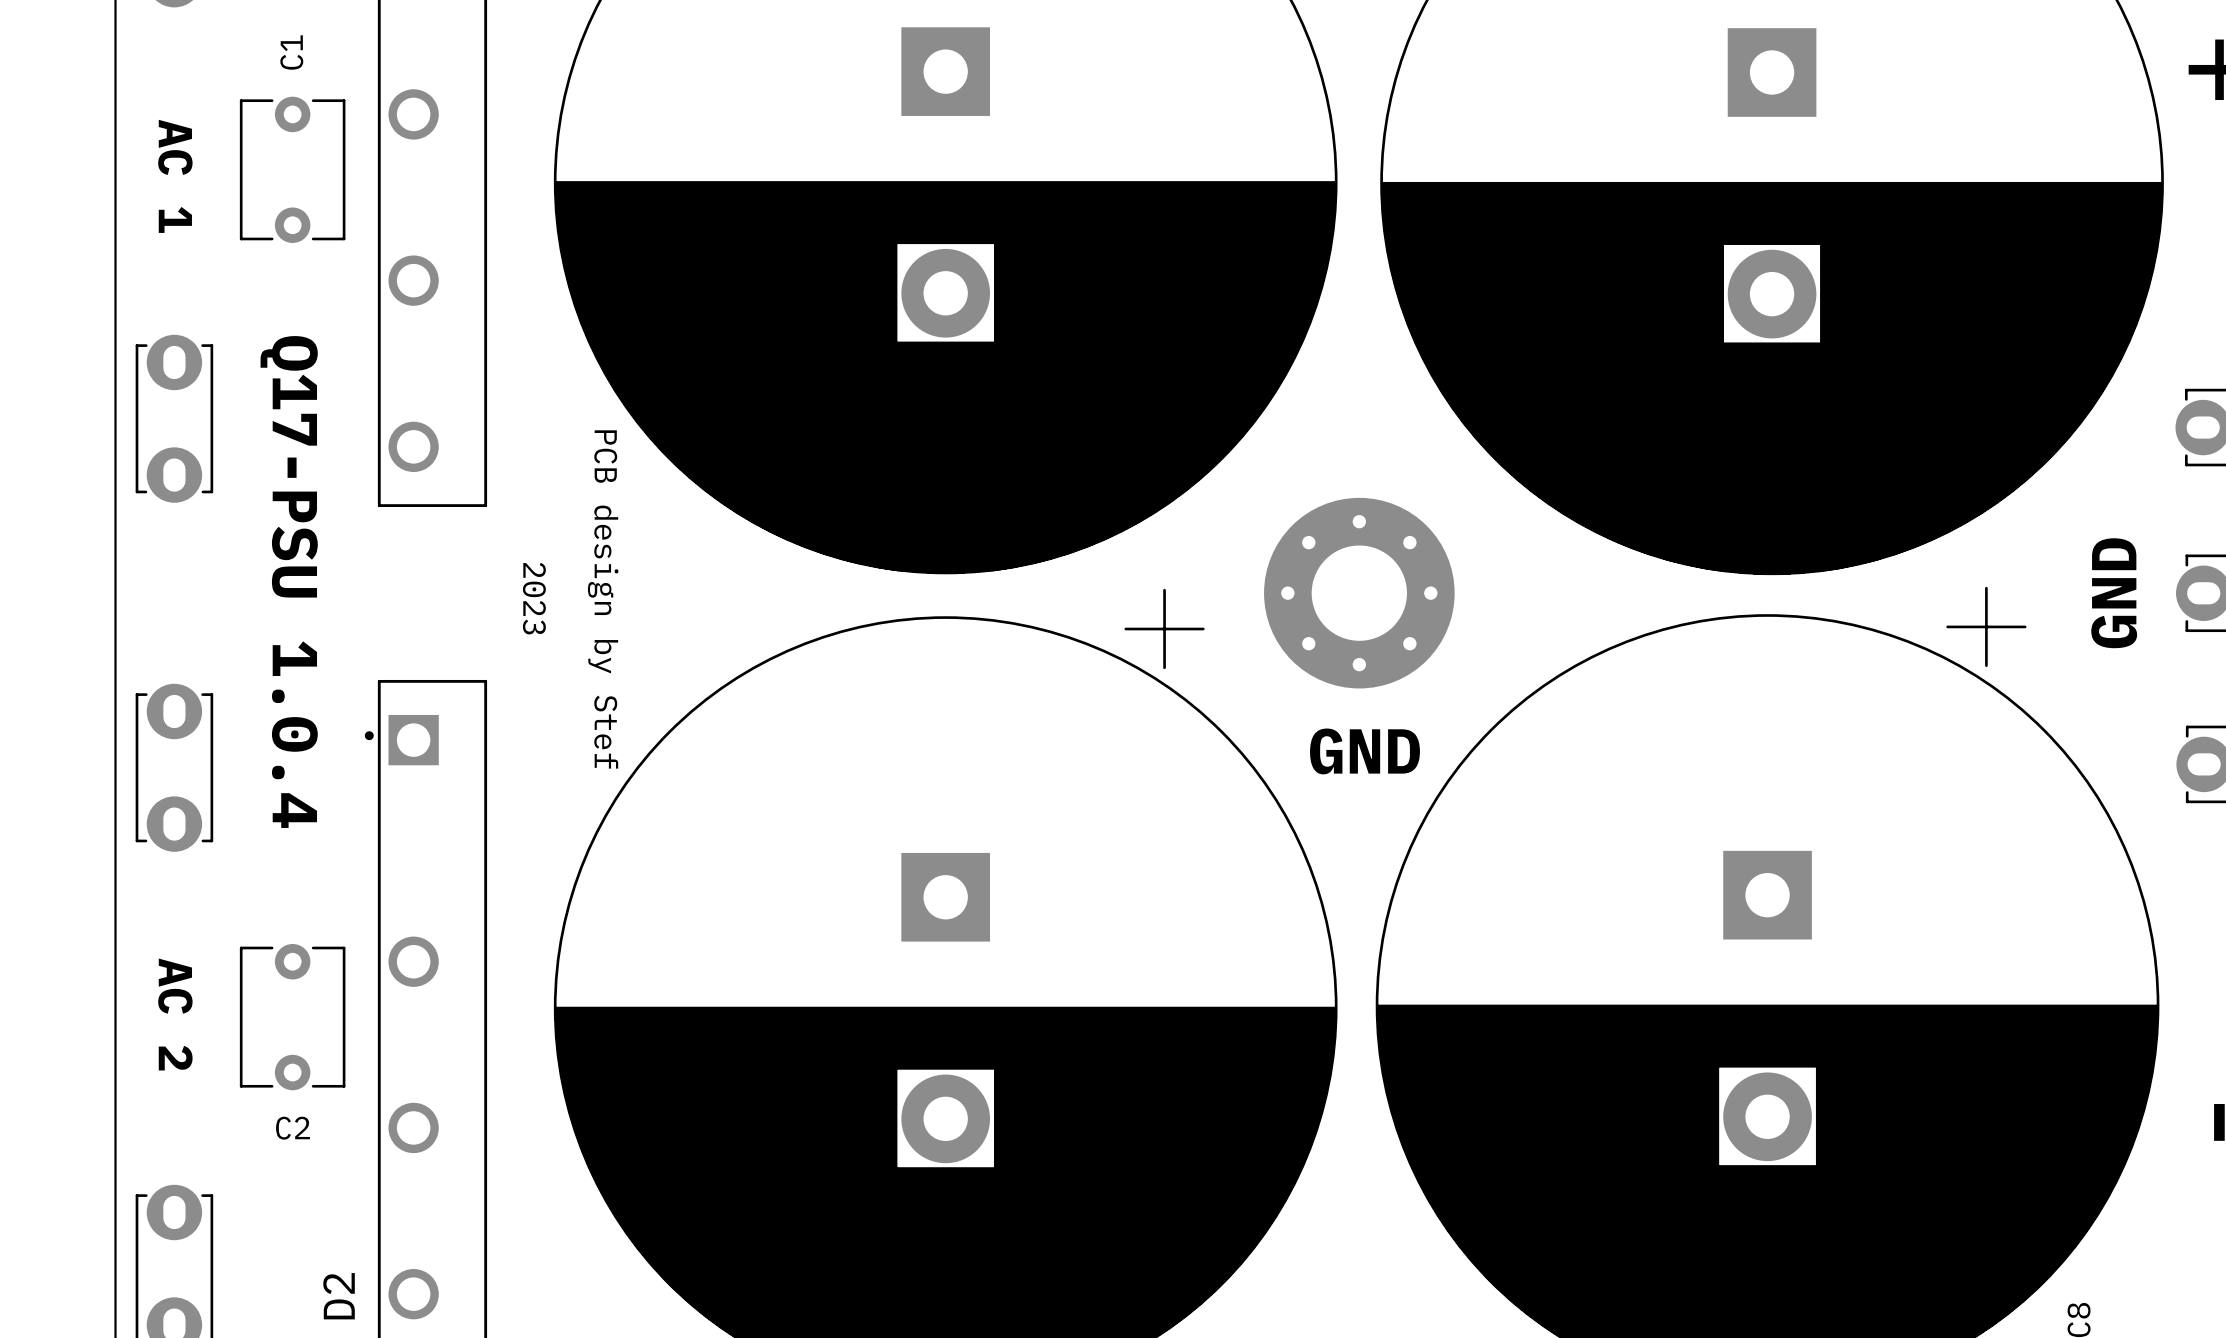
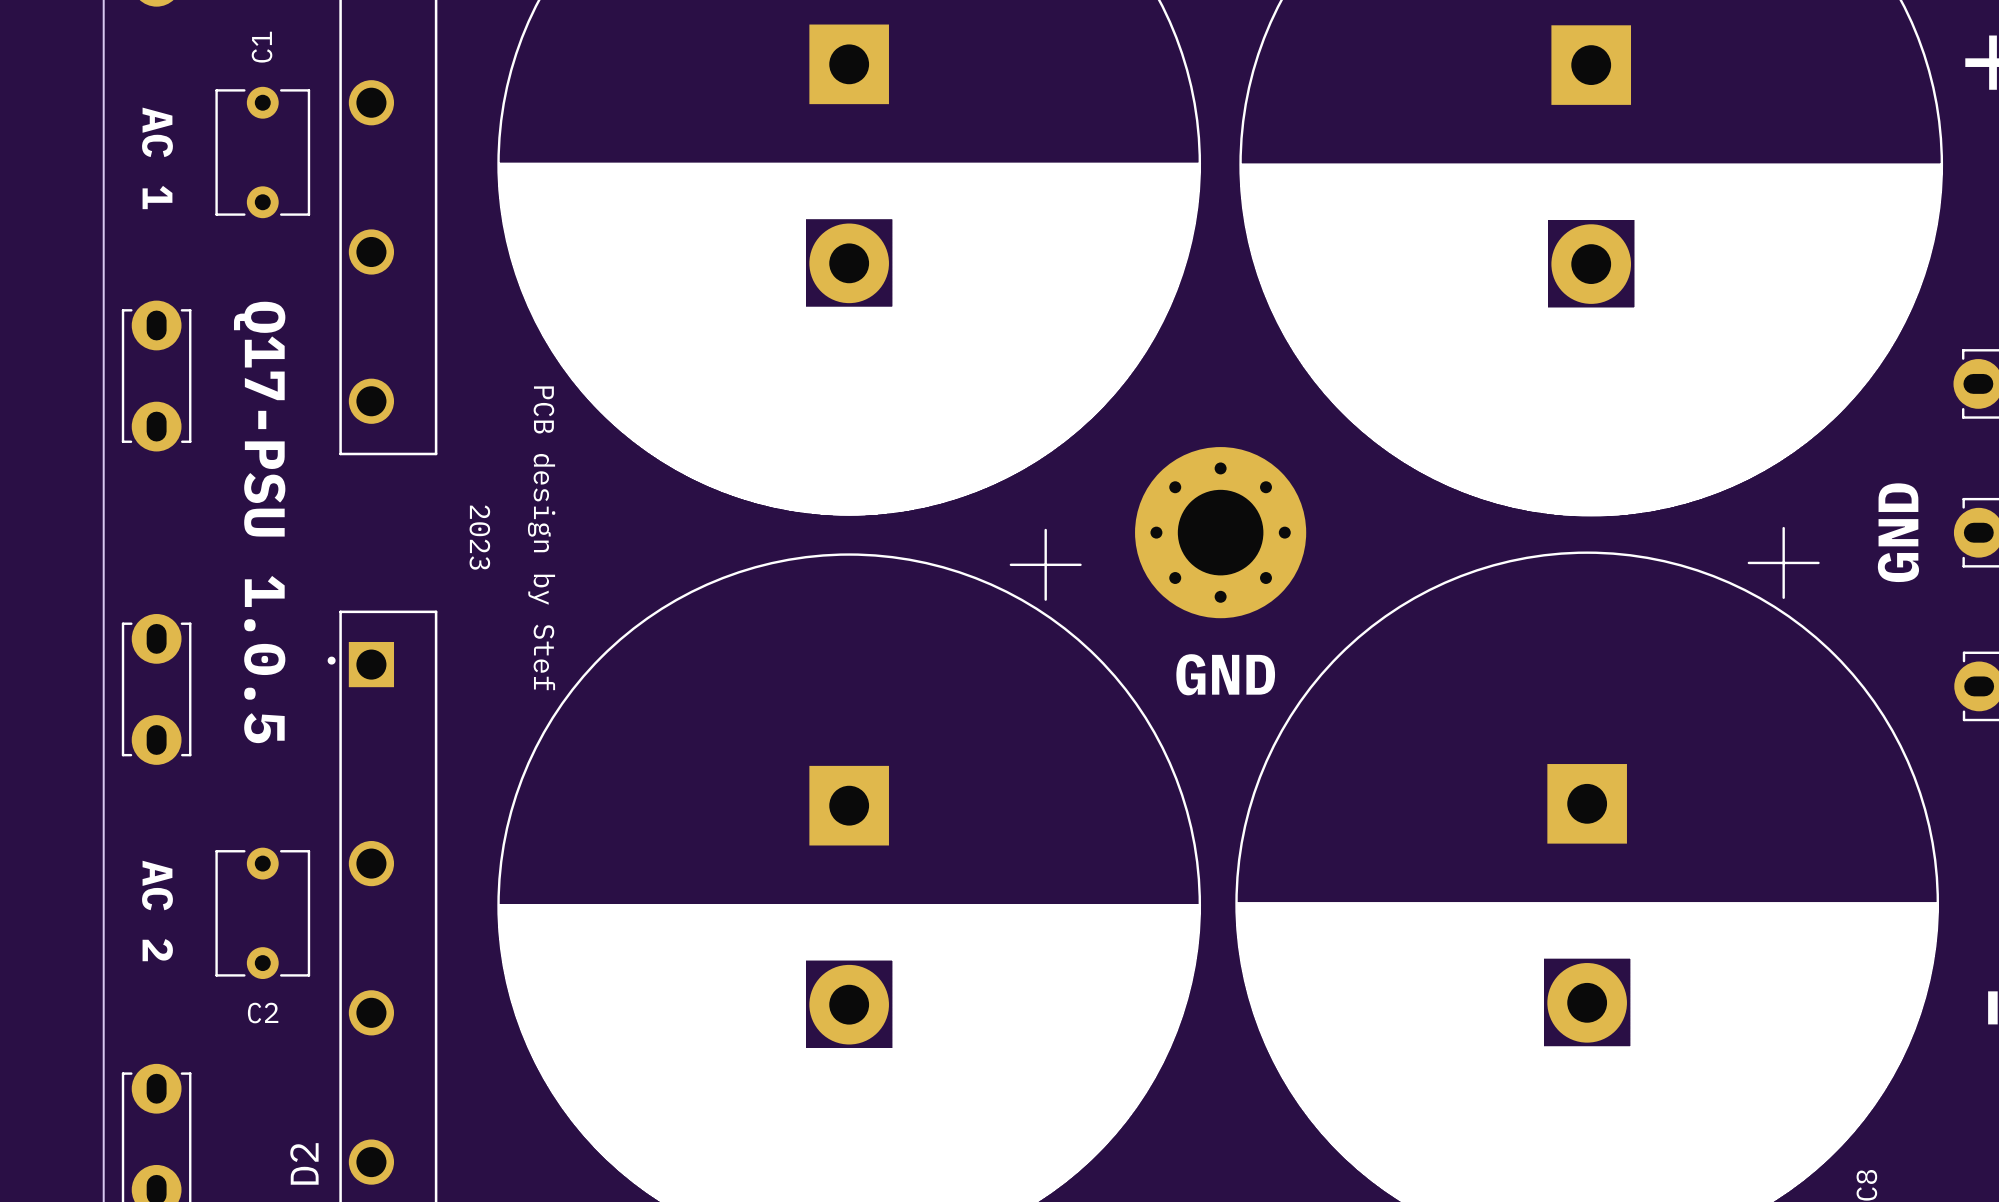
text: Q17-PSU 1.0.4 (289, 582) -> Q17-PSU 1.0.5 (259, 522)

